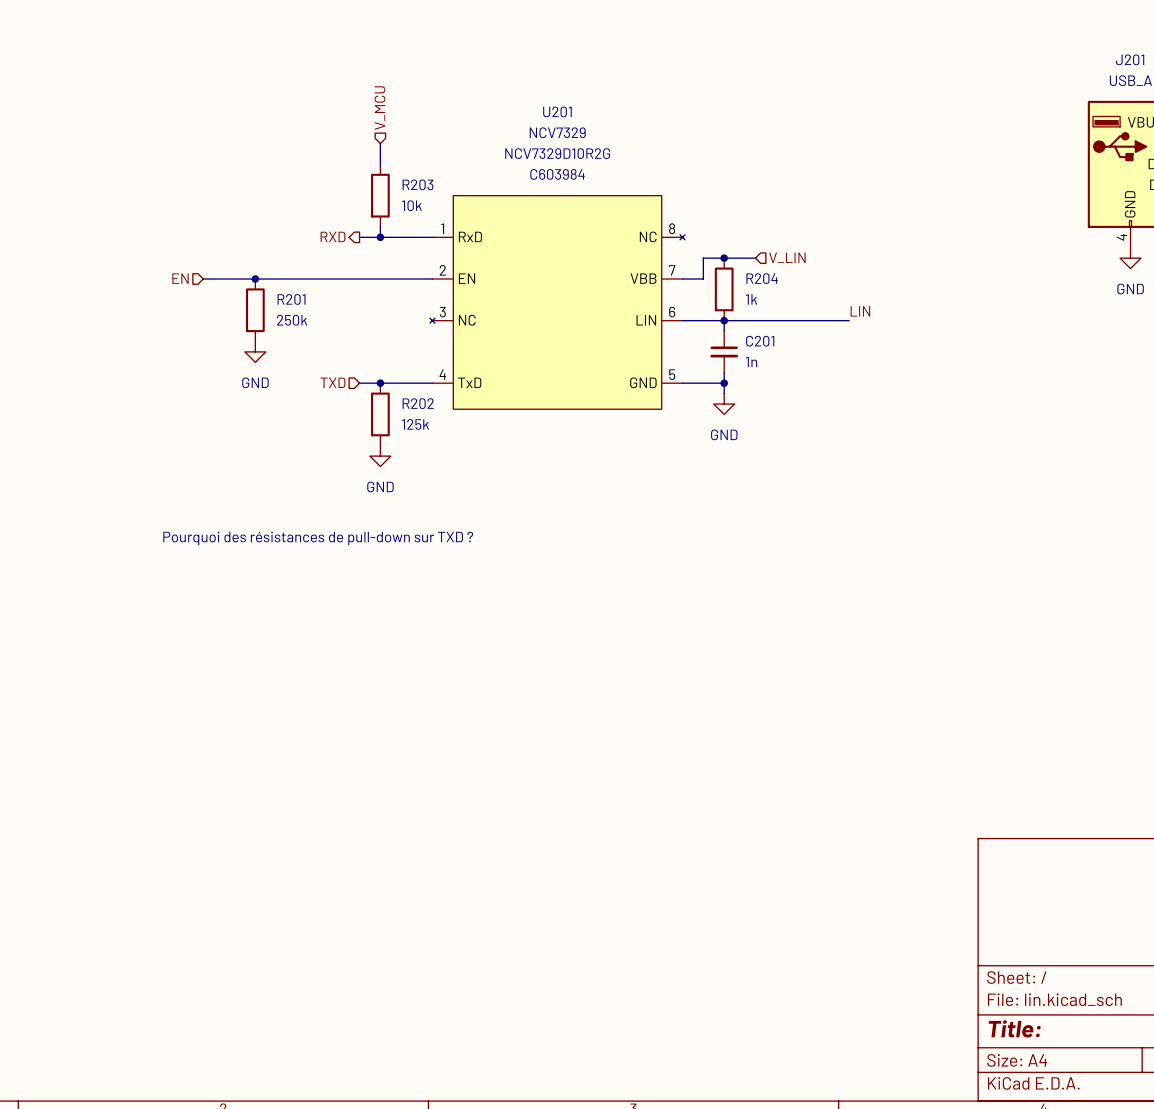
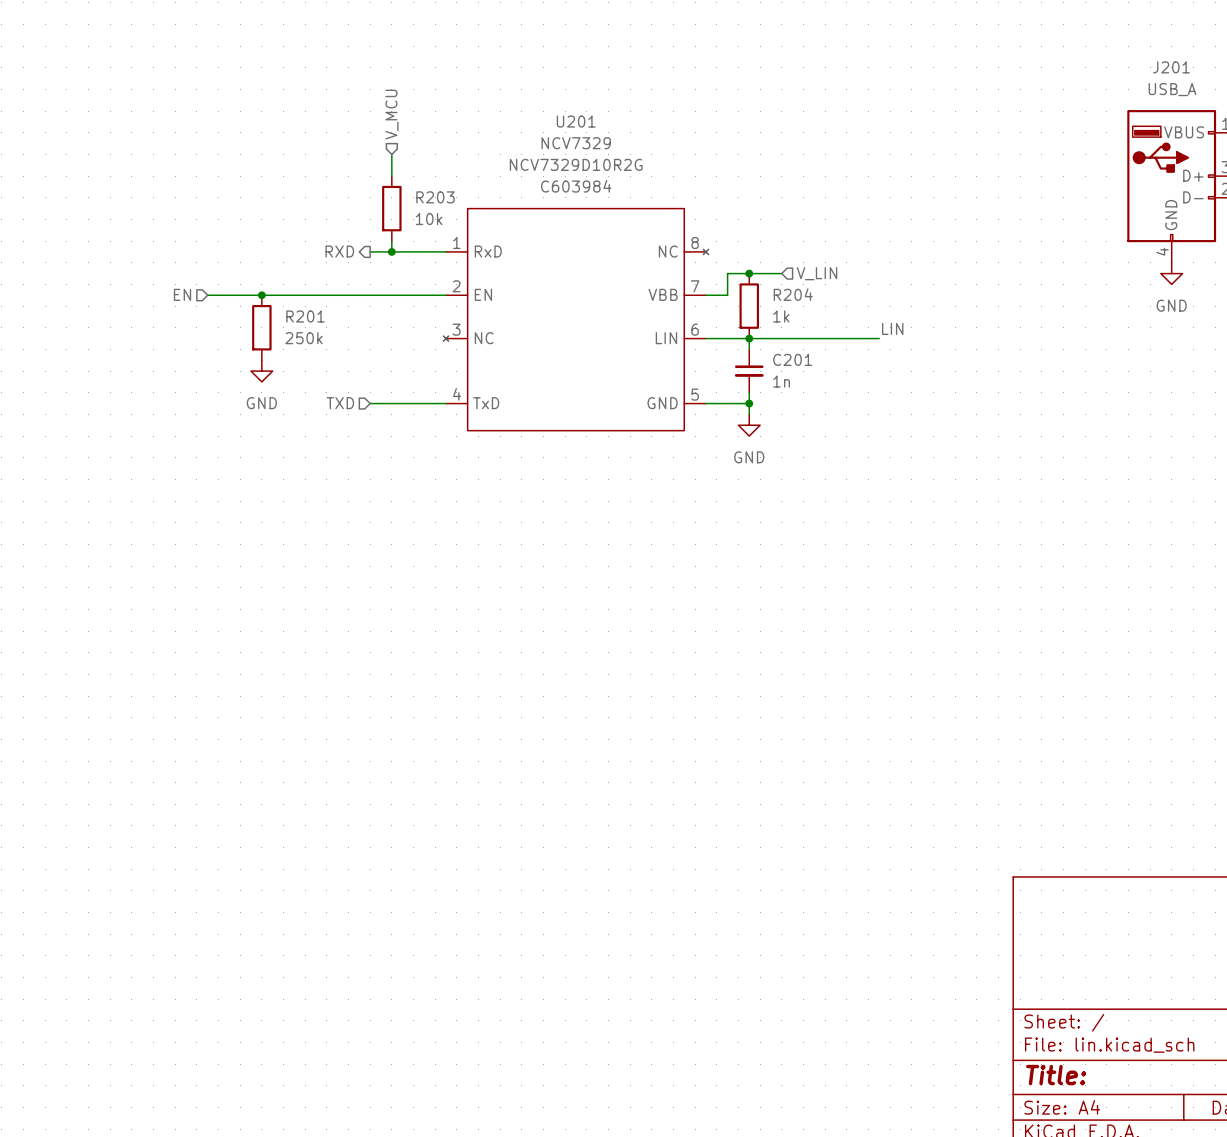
junction: (380, 383) -> none
R202: 125k (380, 414) -> none
power symbol: GND (380, 456) -> none
text: Pourquoi des résistances de pull-down sur TXD ? (318, 538) -> none

